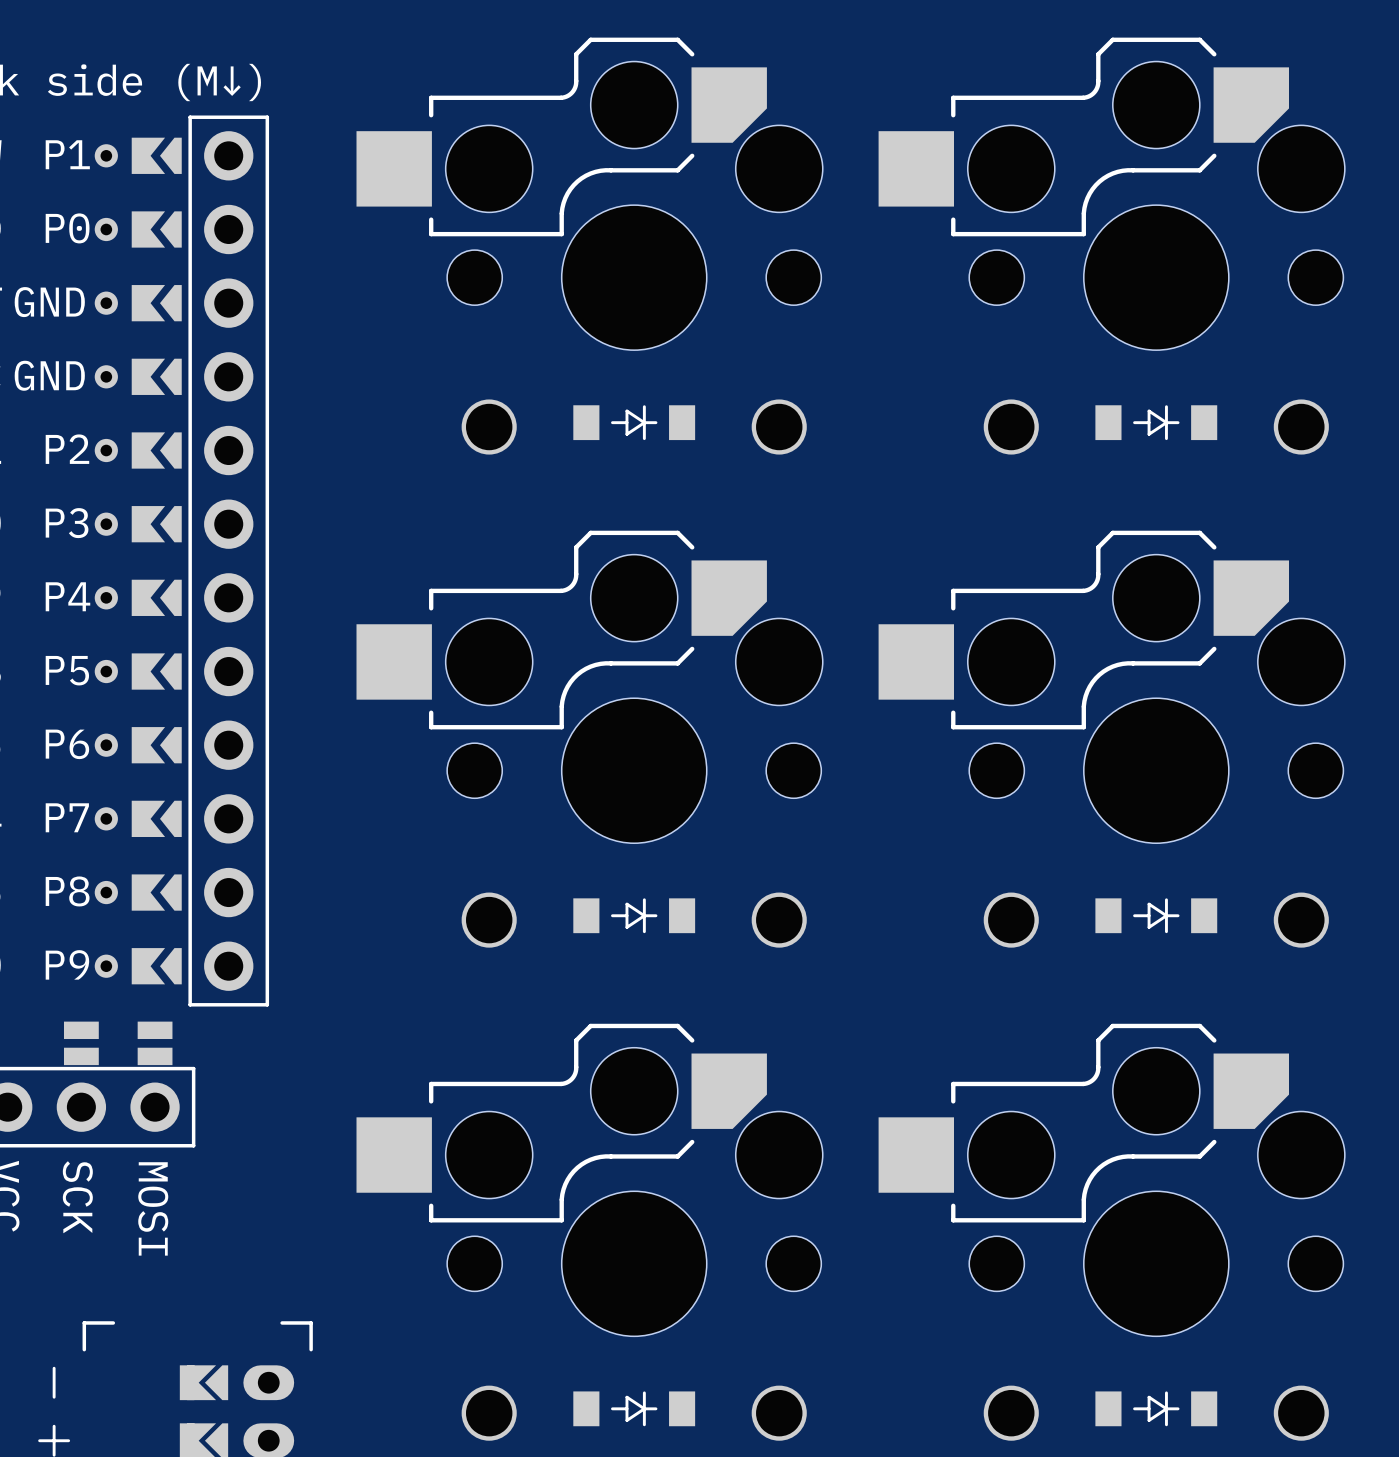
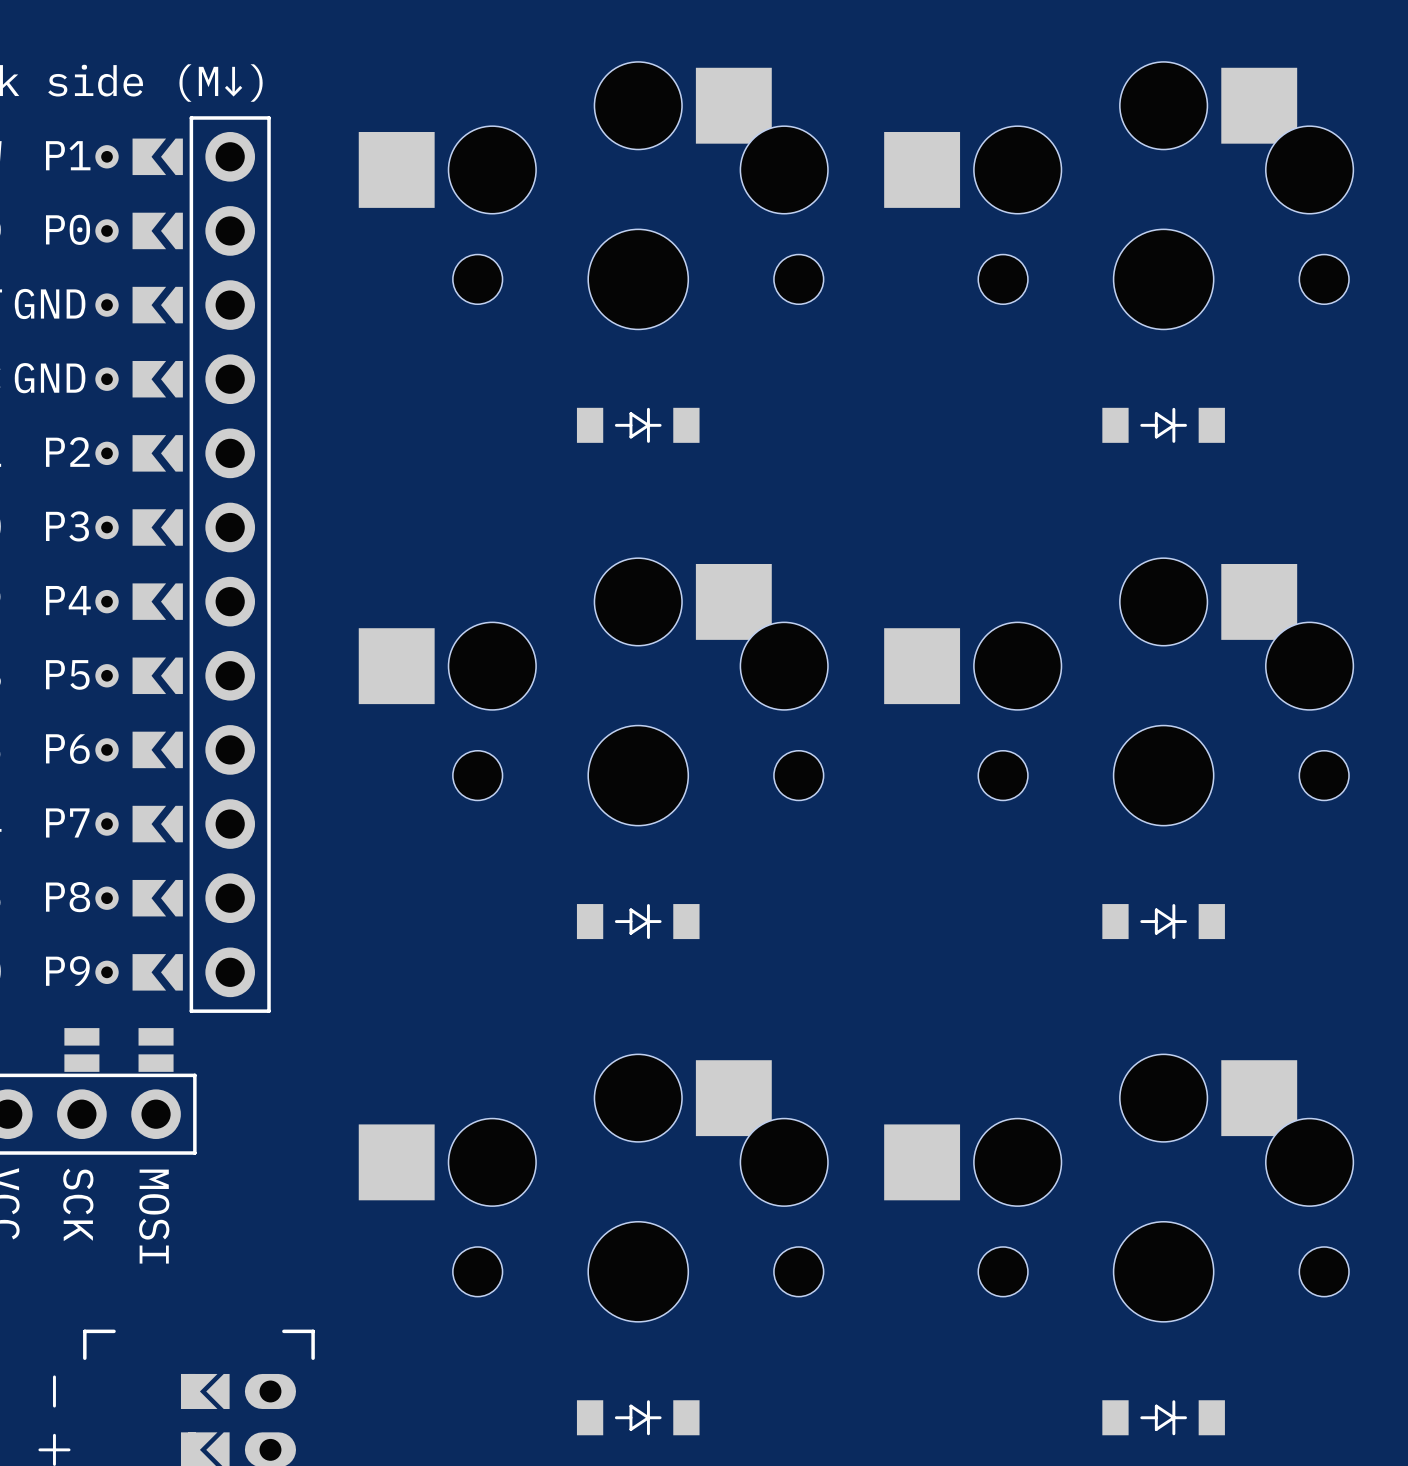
part: none -> (593, 195)
part: none -> (1118, 195)
part: (589, 246) -> none
part: (1111, 246) -> none
part: none -> (593, 691)
part: none -> (1118, 691)
part: (589, 739) -> none
part: (1111, 739) -> none
part: none -> (593, 1188)
part: none -> (1118, 1188)
part: (589, 1232) -> none
part: (1111, 1232) -> none

